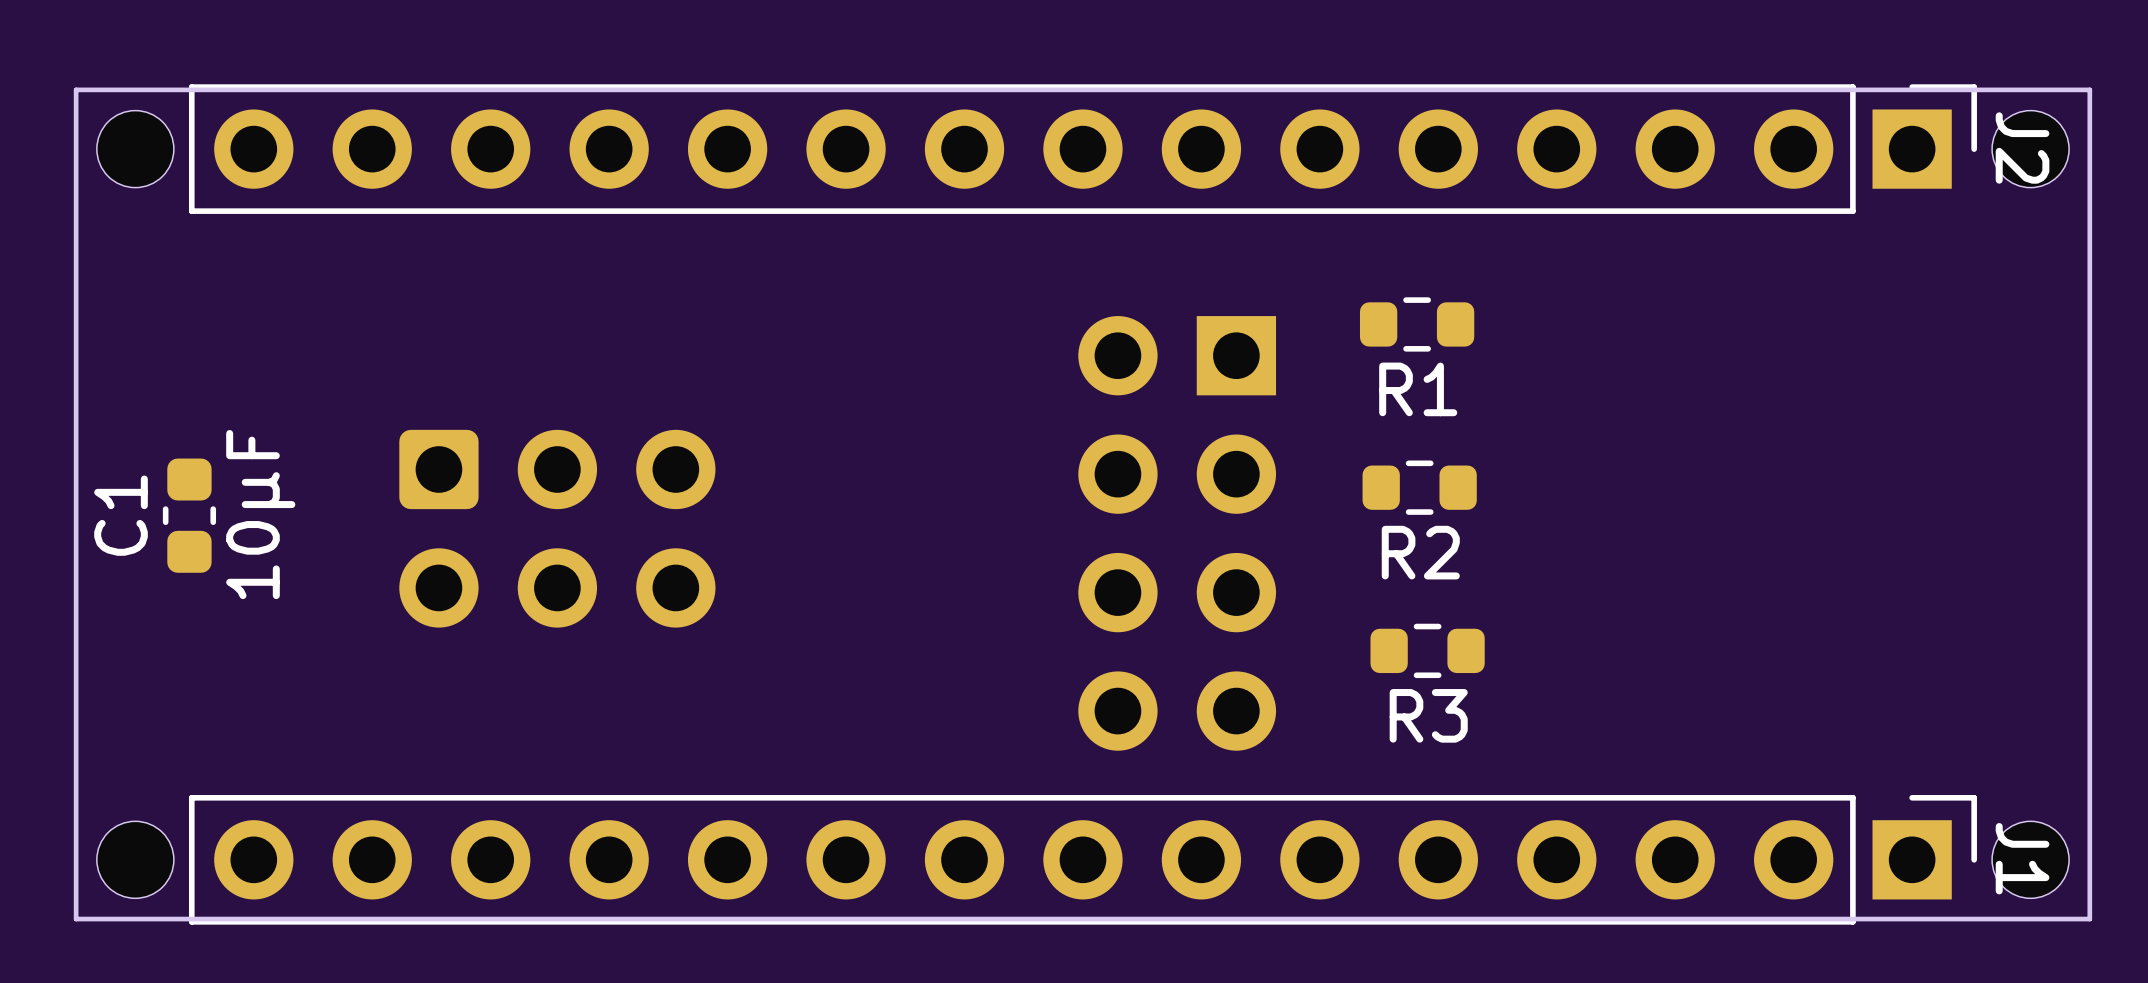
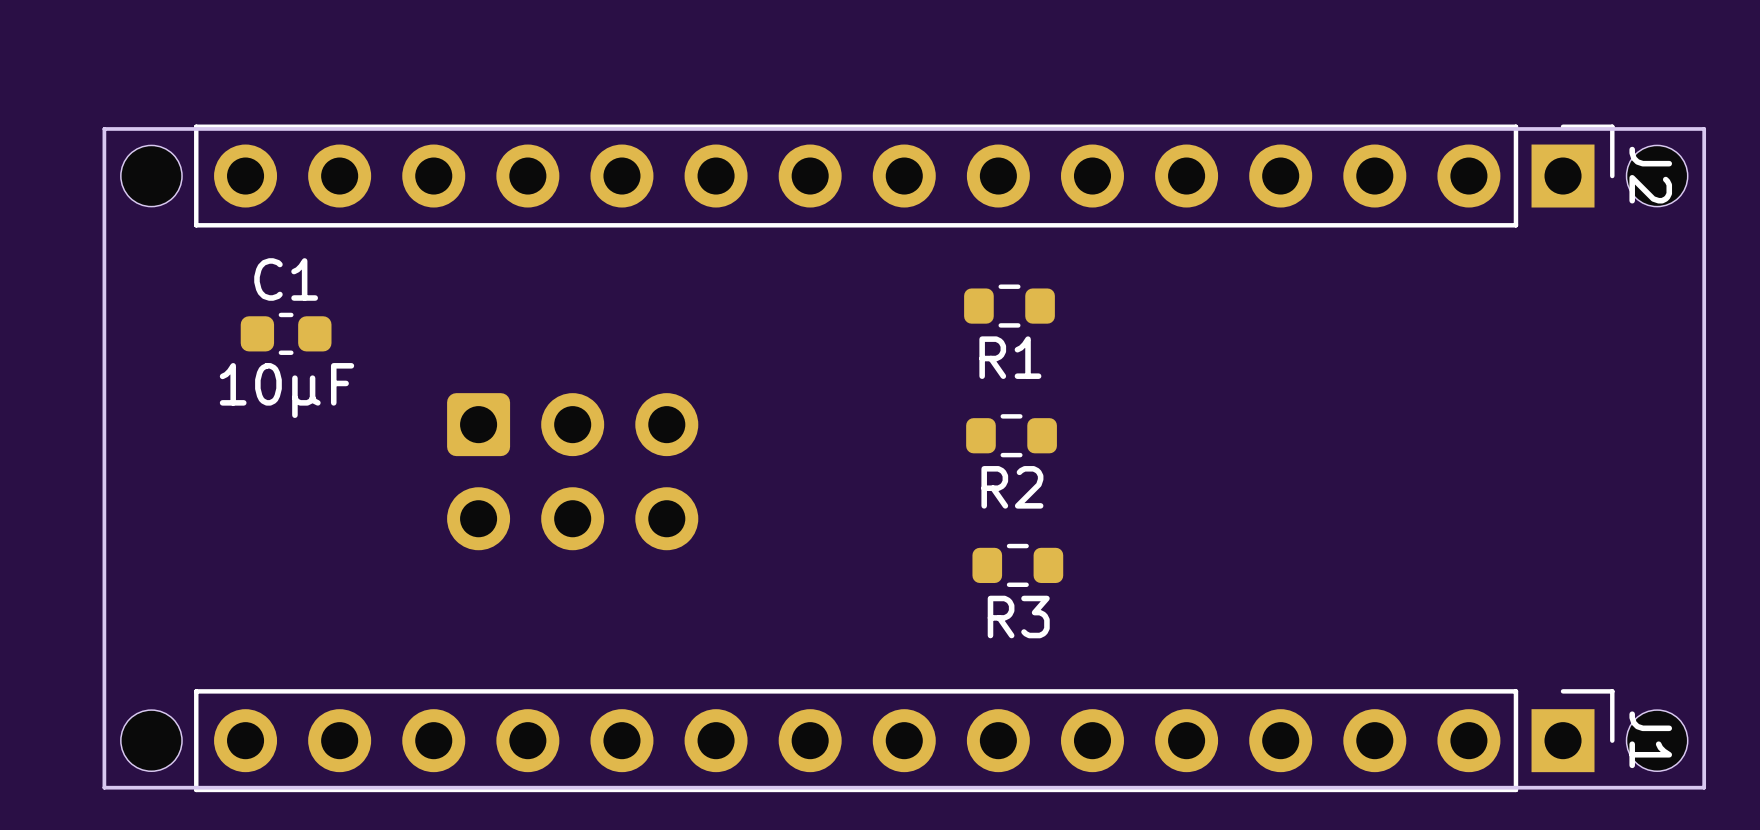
R1 position: (1417, 324) -> (1009, 306)
R2 position: (1419, 487) -> (1011, 435)
C1 rotation: 0° (189, 515) -> 90° clockwise (286, 333)
C1 position: (189, 515) -> (286, 333)
part position: (557, 528) -> (572, 471)
part: (1177, 533) -> none
R3 position: (1427, 650) -> (1017, 565)

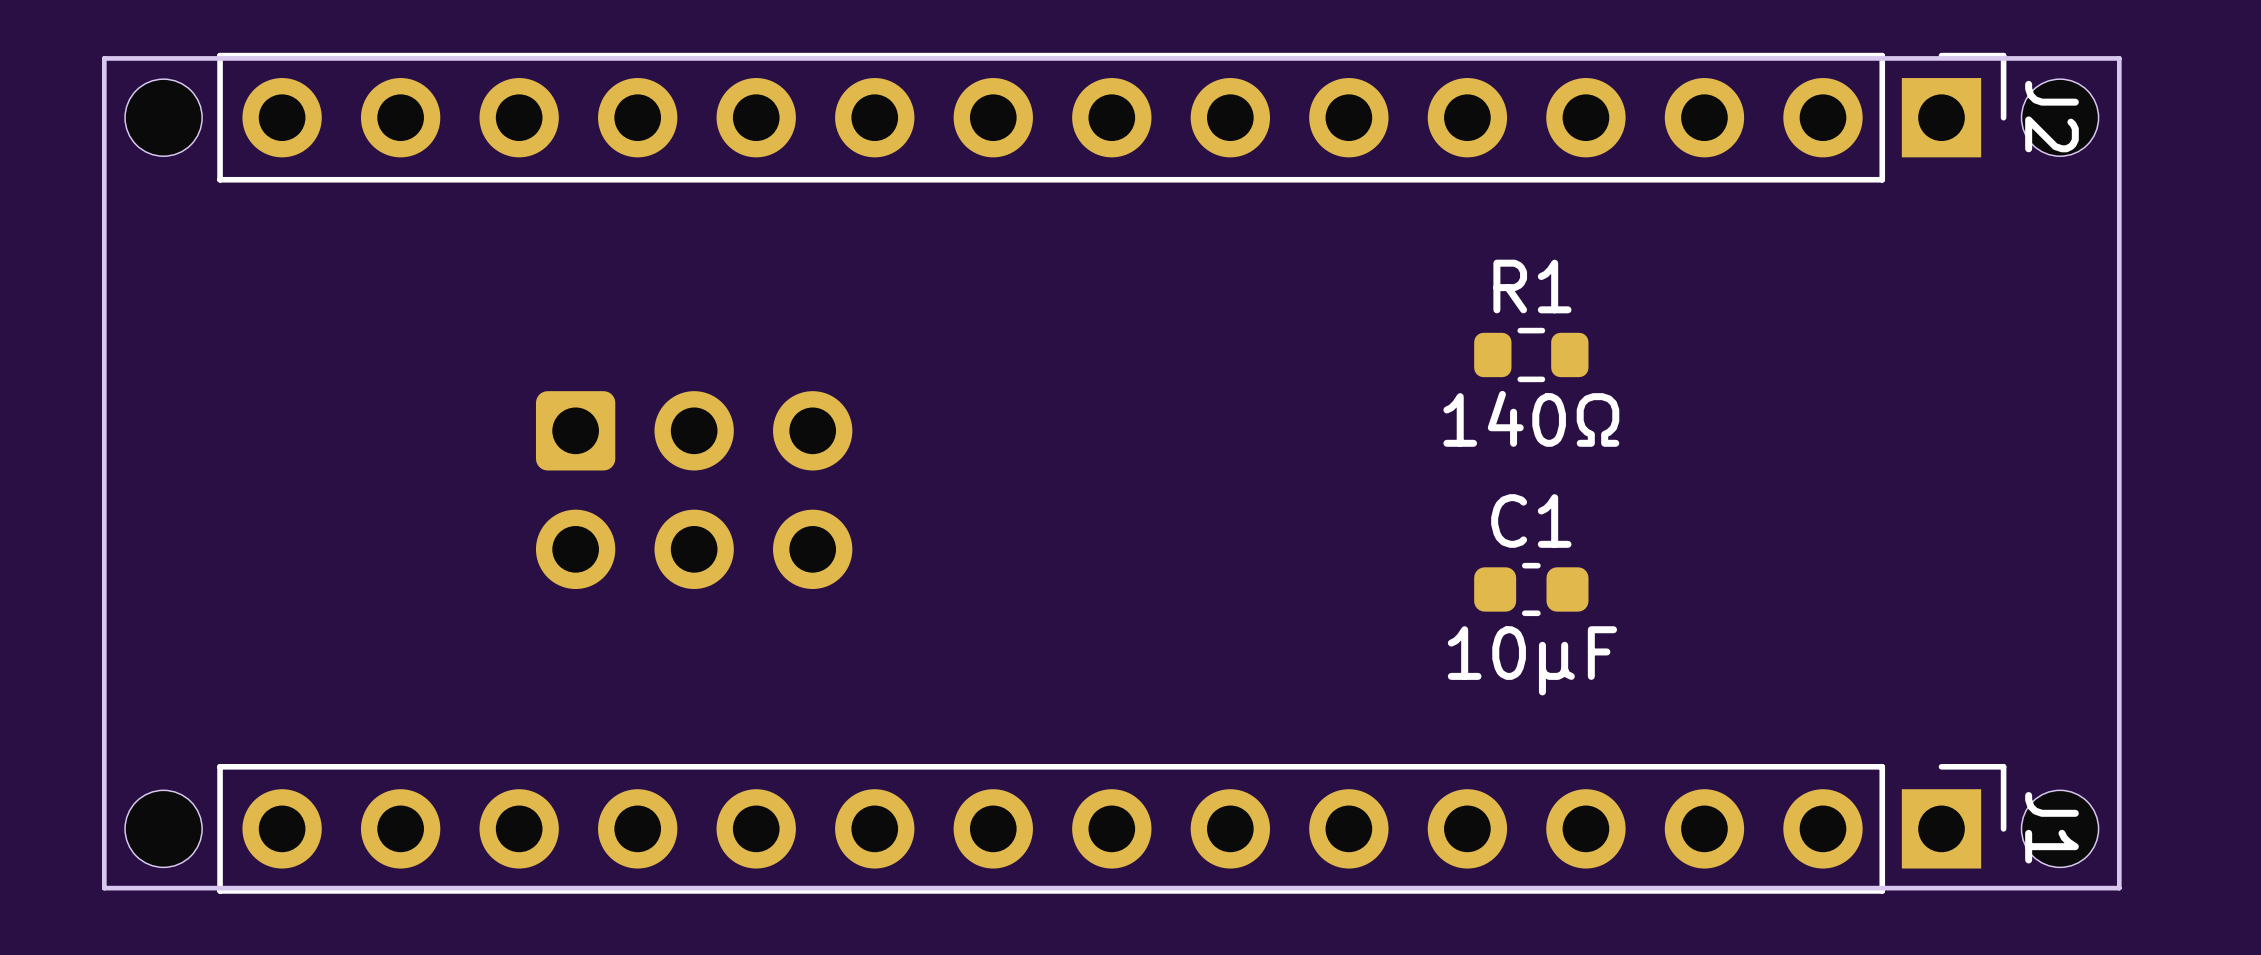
R1 position: (1009, 306) -> (1531, 354)
C1 position: (286, 333) -> (1531, 589)
R1 name position: R1 (1010, 357) -> R1 (1532, 286)
R1 value: none -> 140Ω (1531, 418)
R2: (1011, 435) -> none
R3: (1017, 565) -> none

